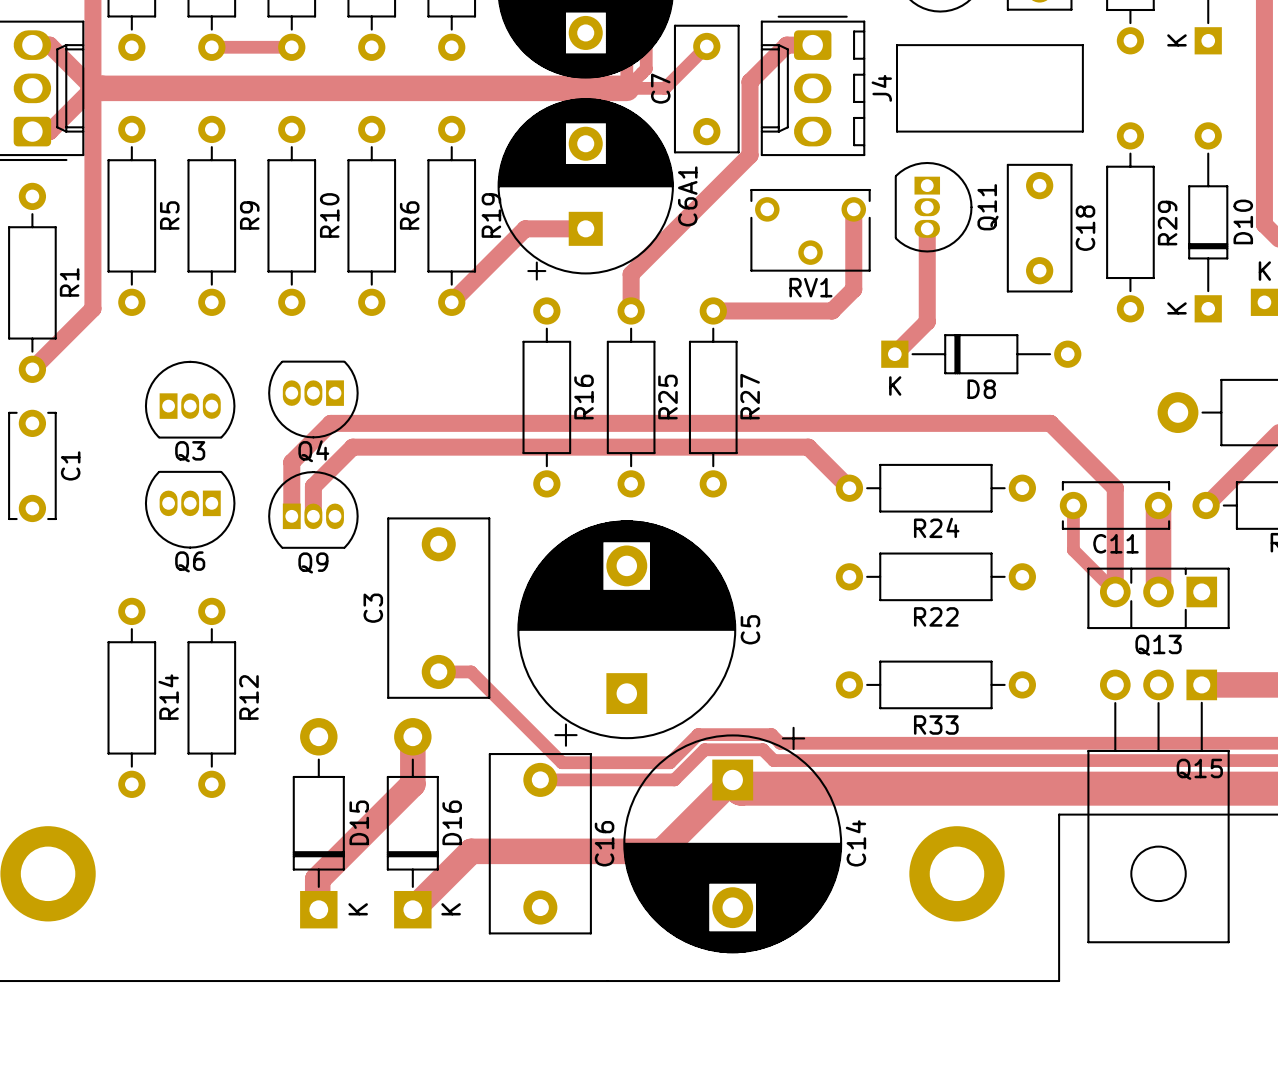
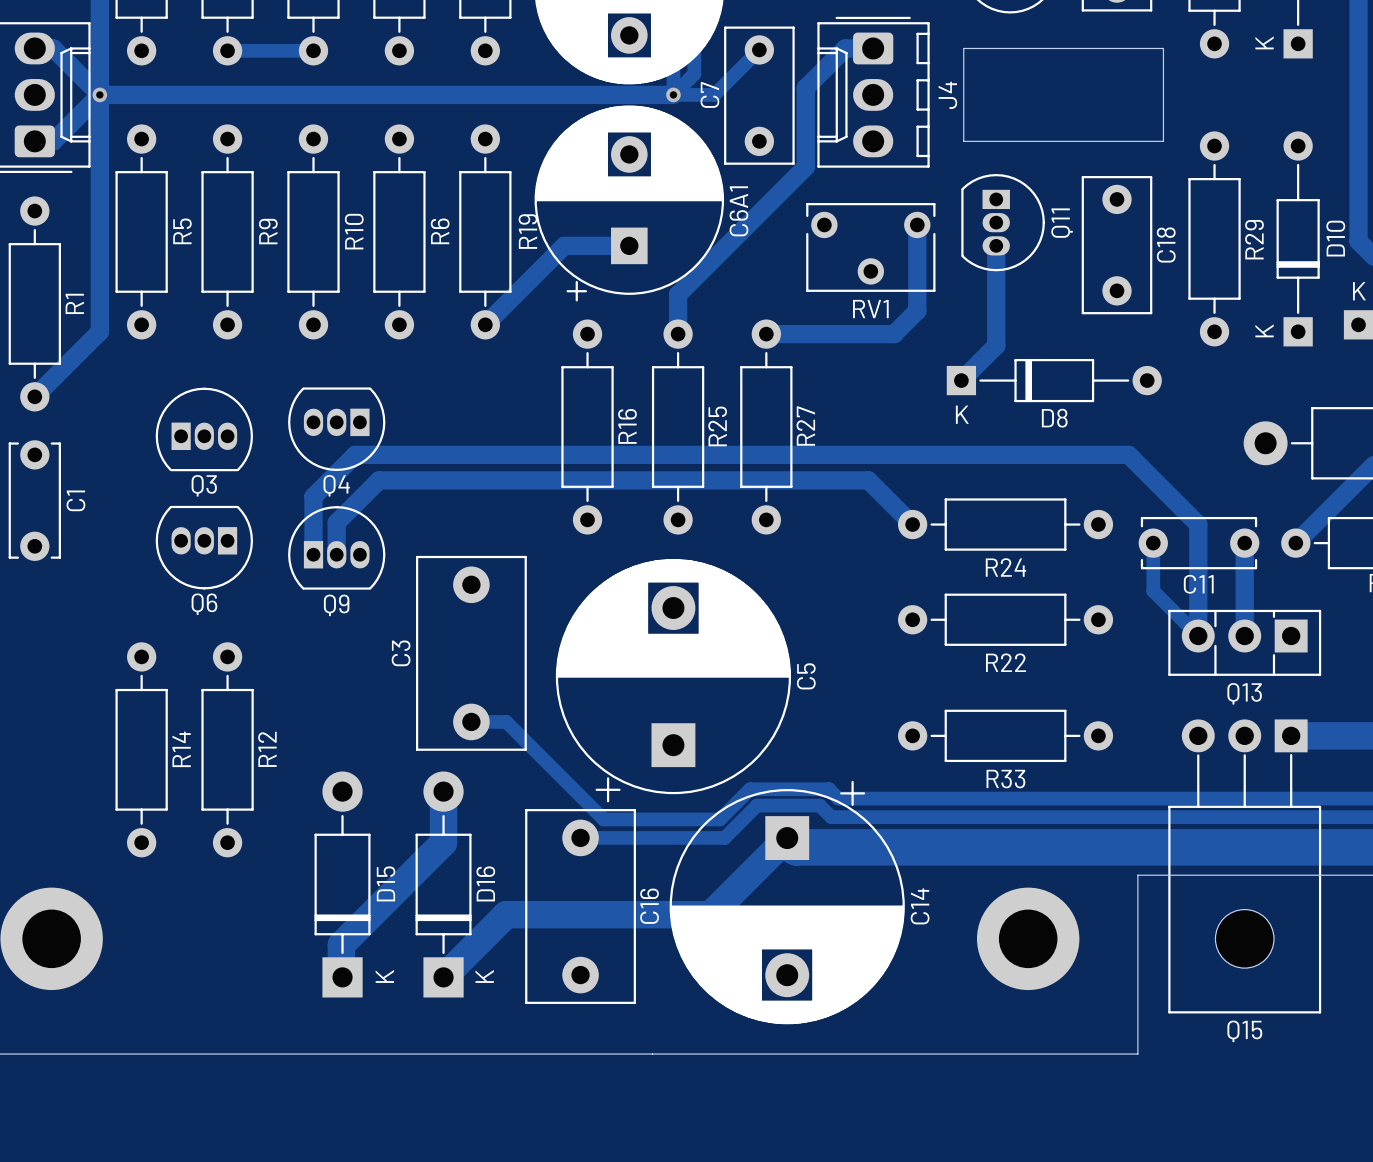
track width: thick (92, 88) (626, 88) -> thin (99, 94) (673, 94)
via: none -> (99, 94)
via: none -> (673, 94)
track width: thick (1158, 505) (1158, 591) -> thin (1244, 543) (1244, 636)
Q15 name position: Q15 (1199, 769) -> Q15 (1244, 1031)

